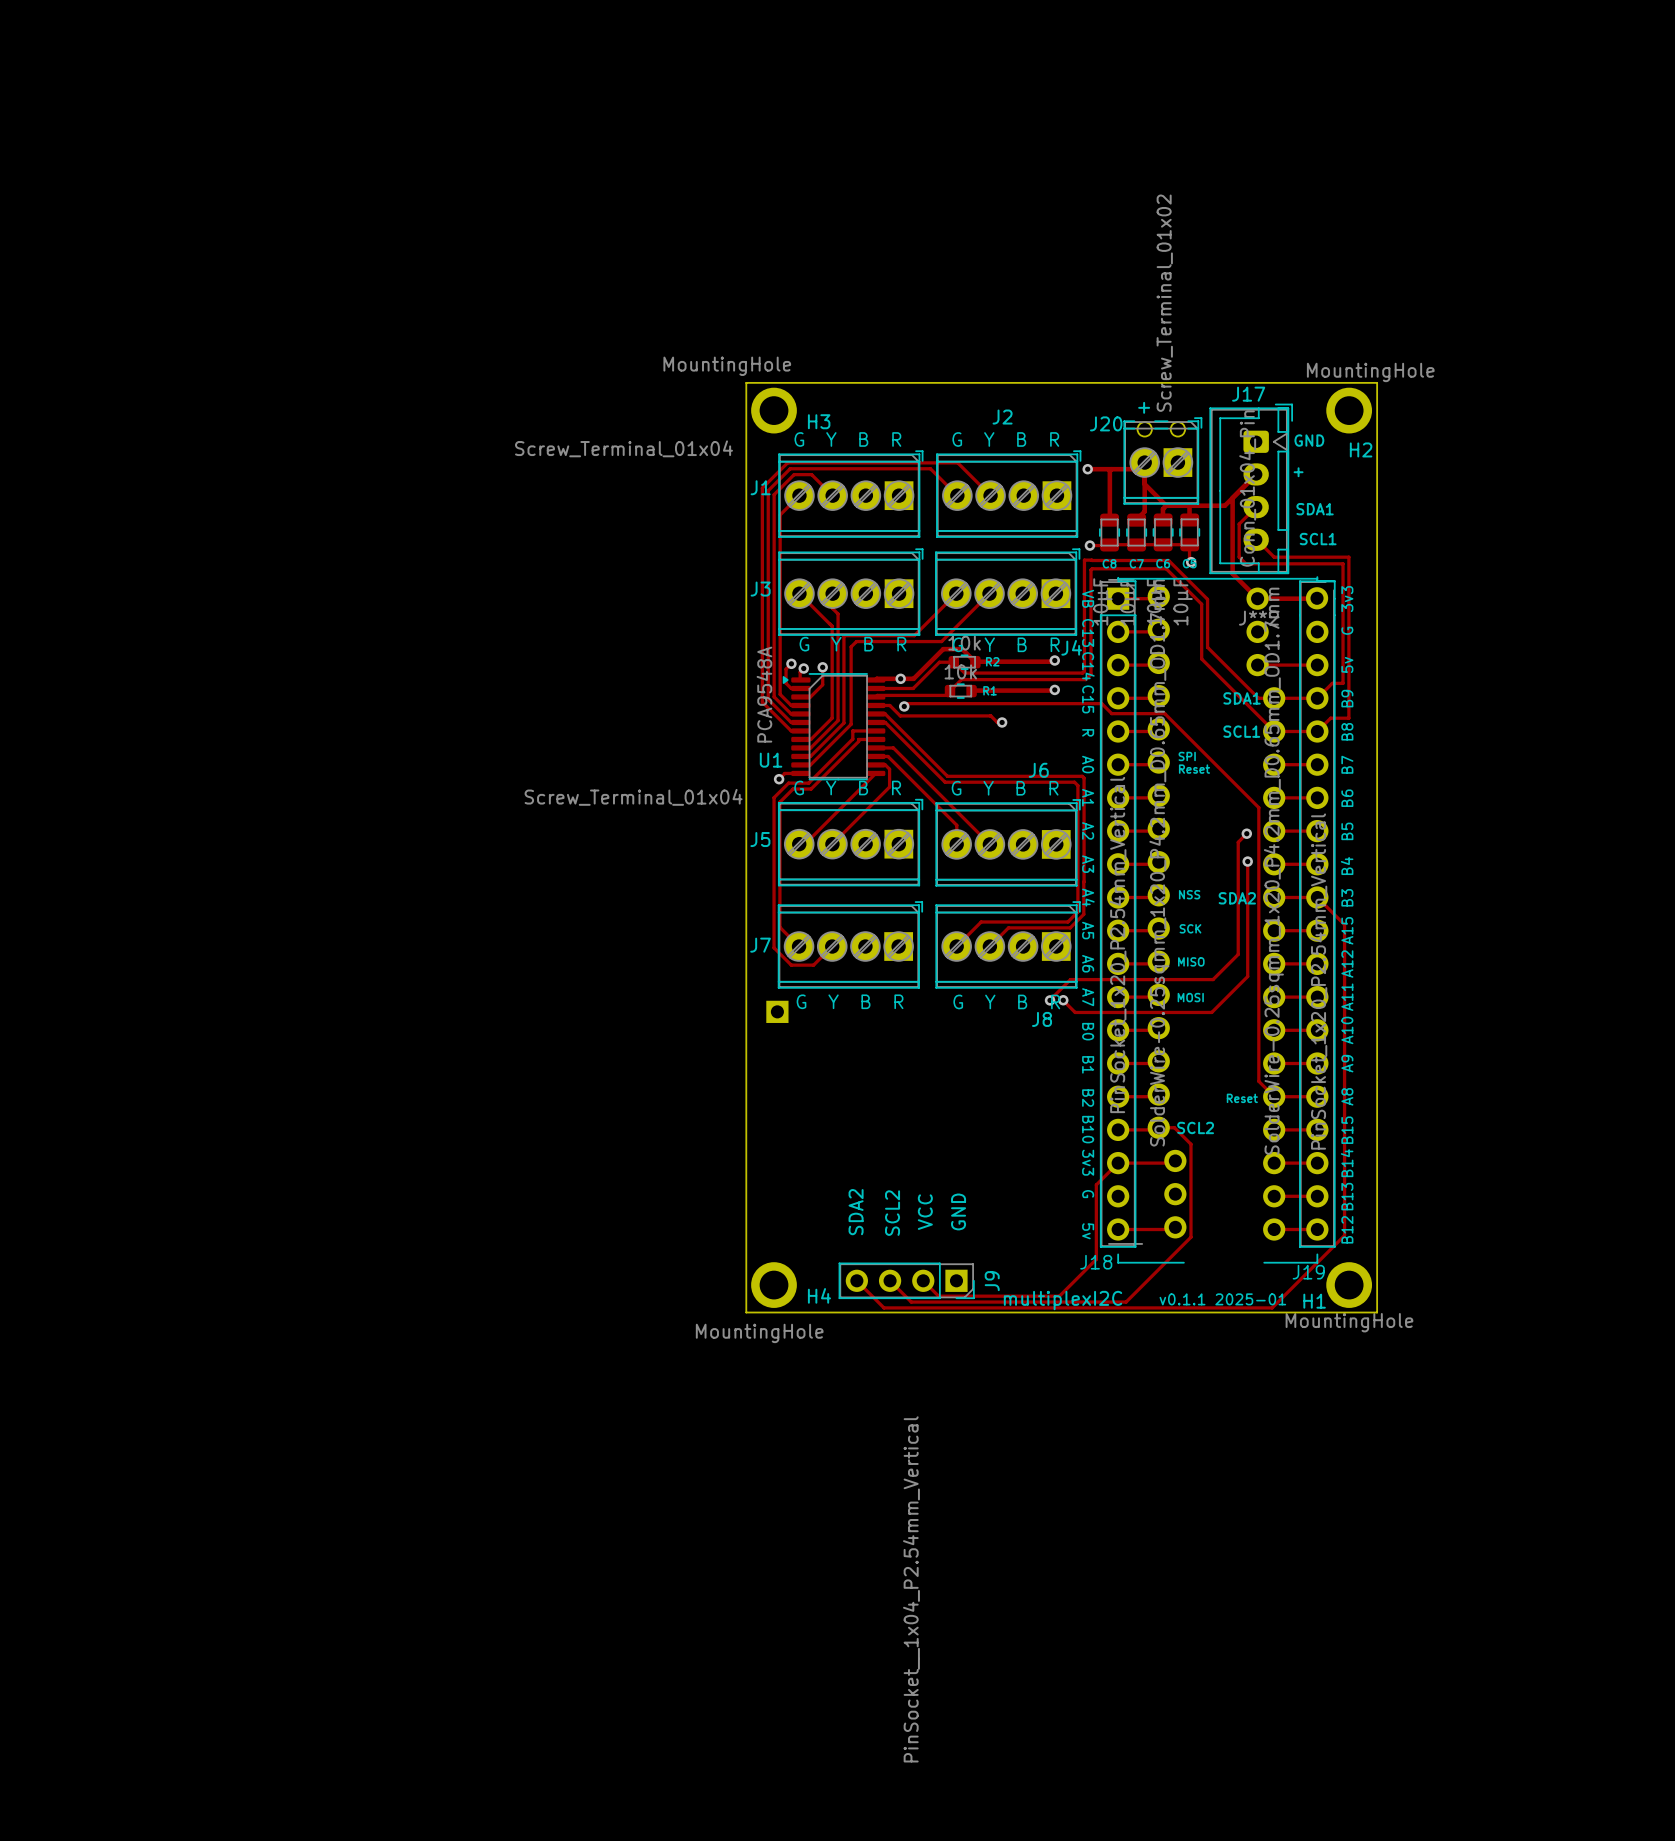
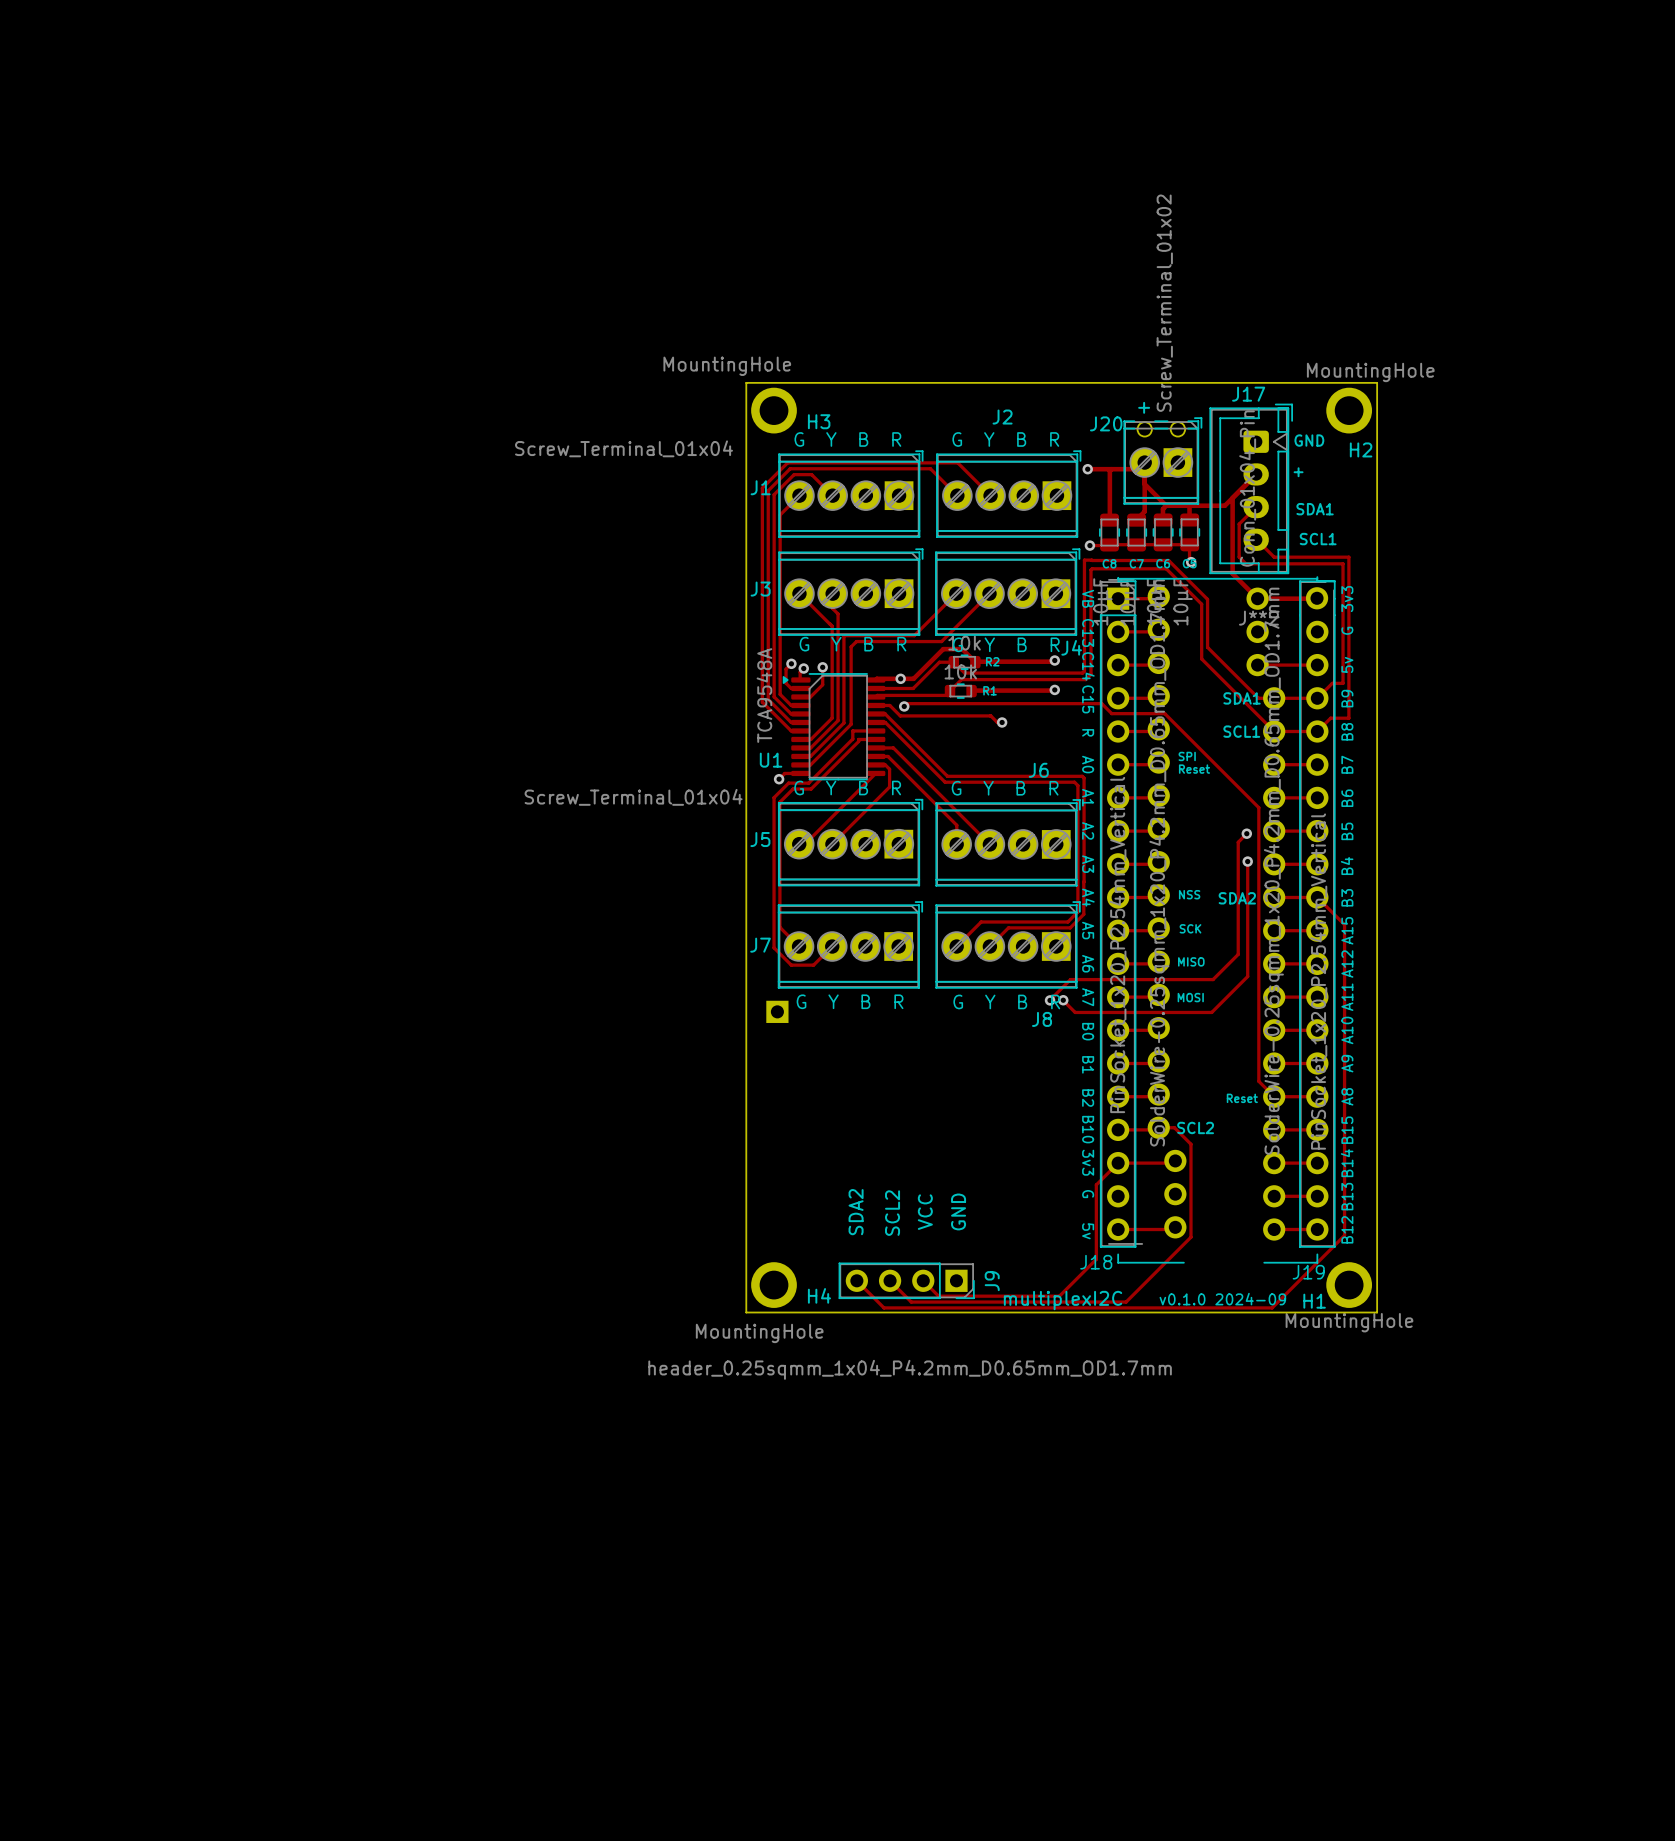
U1 value: PCA9548A (764, 694) -> TCA9548A (764, 695)
text: v0.1.1 2025-01 (1222, 1299) -> v0.1.0 2024-09 (1222, 1299)
J9 value: PinSocket__1x04_P2.54mm_Vertical (911, 1589) -> header_0.25sqmm_1x04_P4.2mm_D0.65mm_OD1.7mm (910, 1369)

